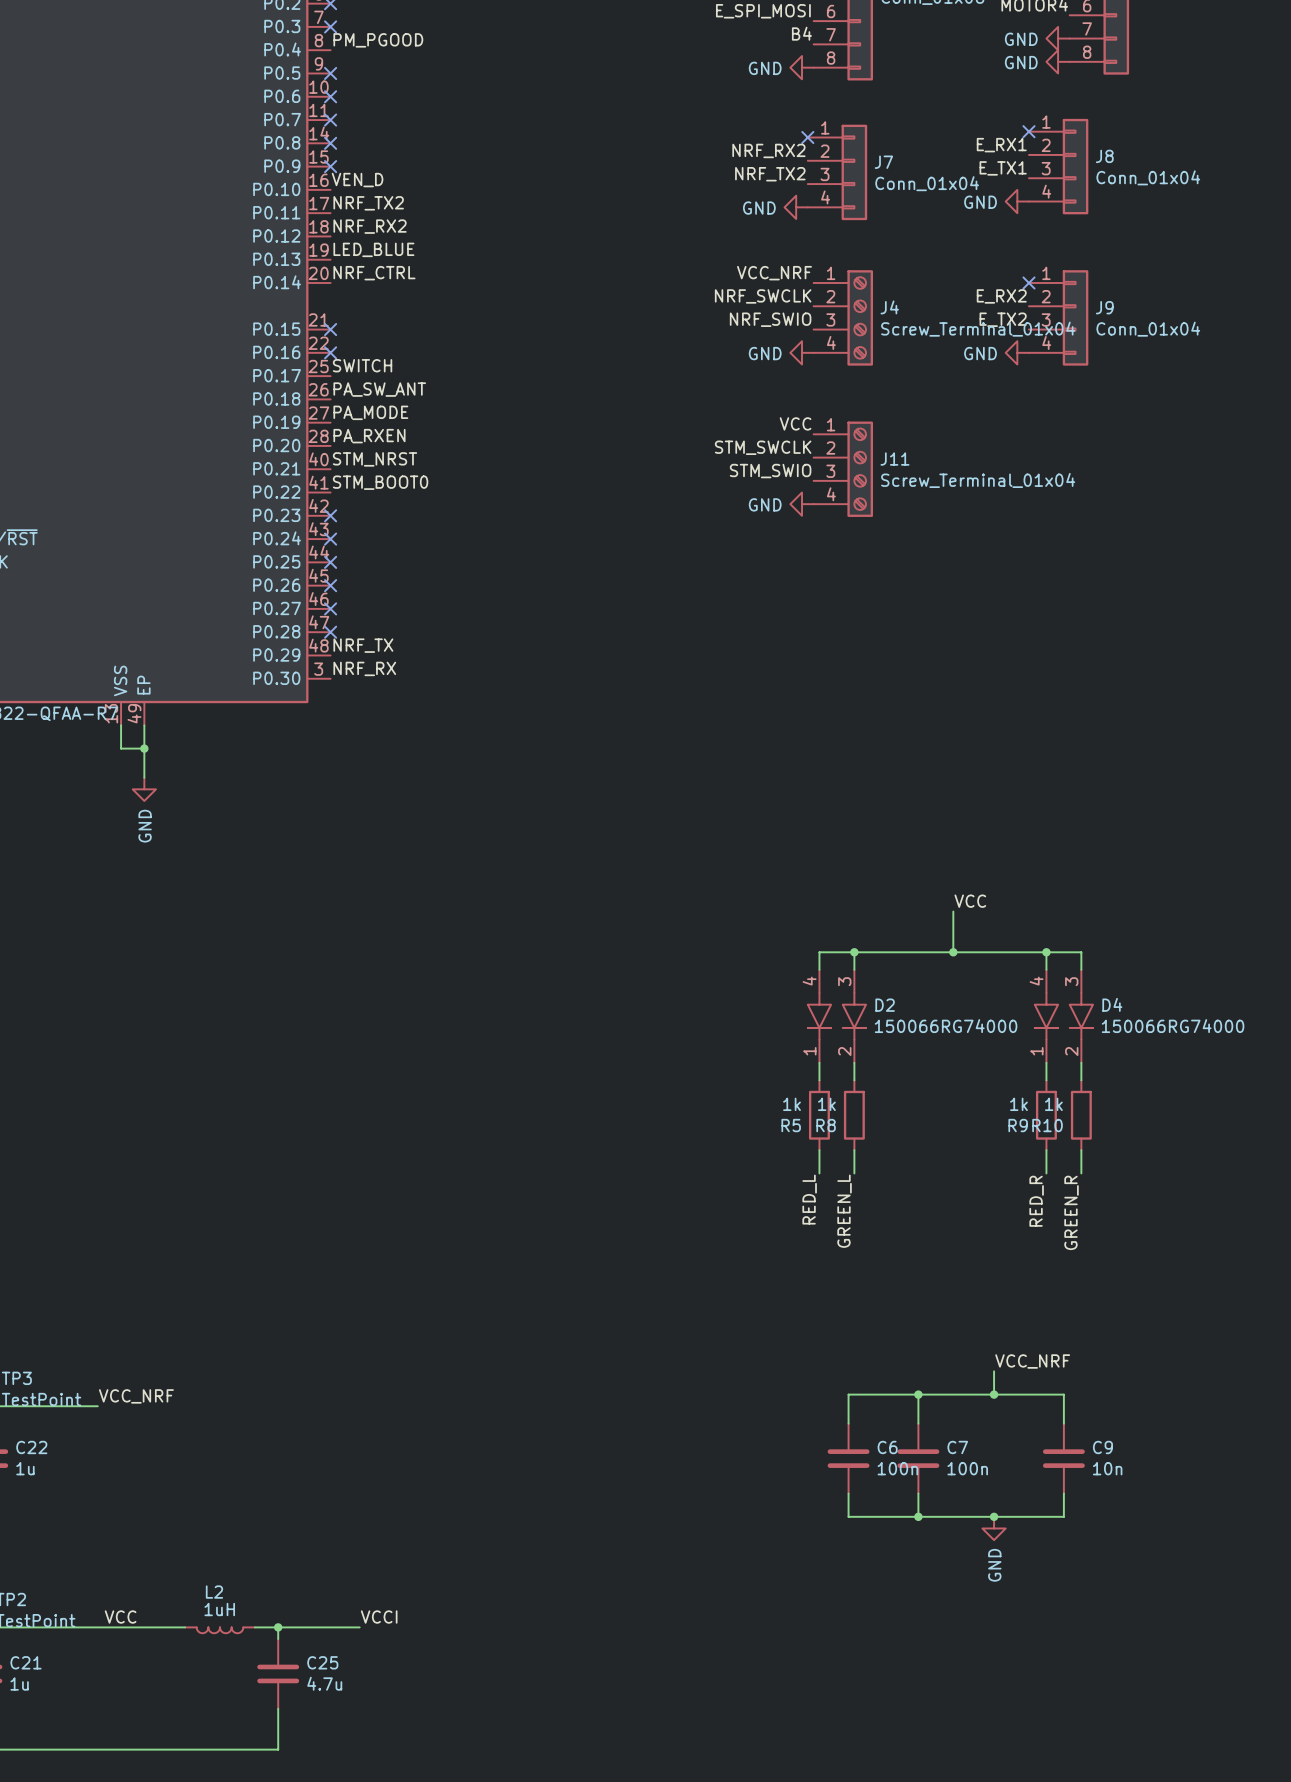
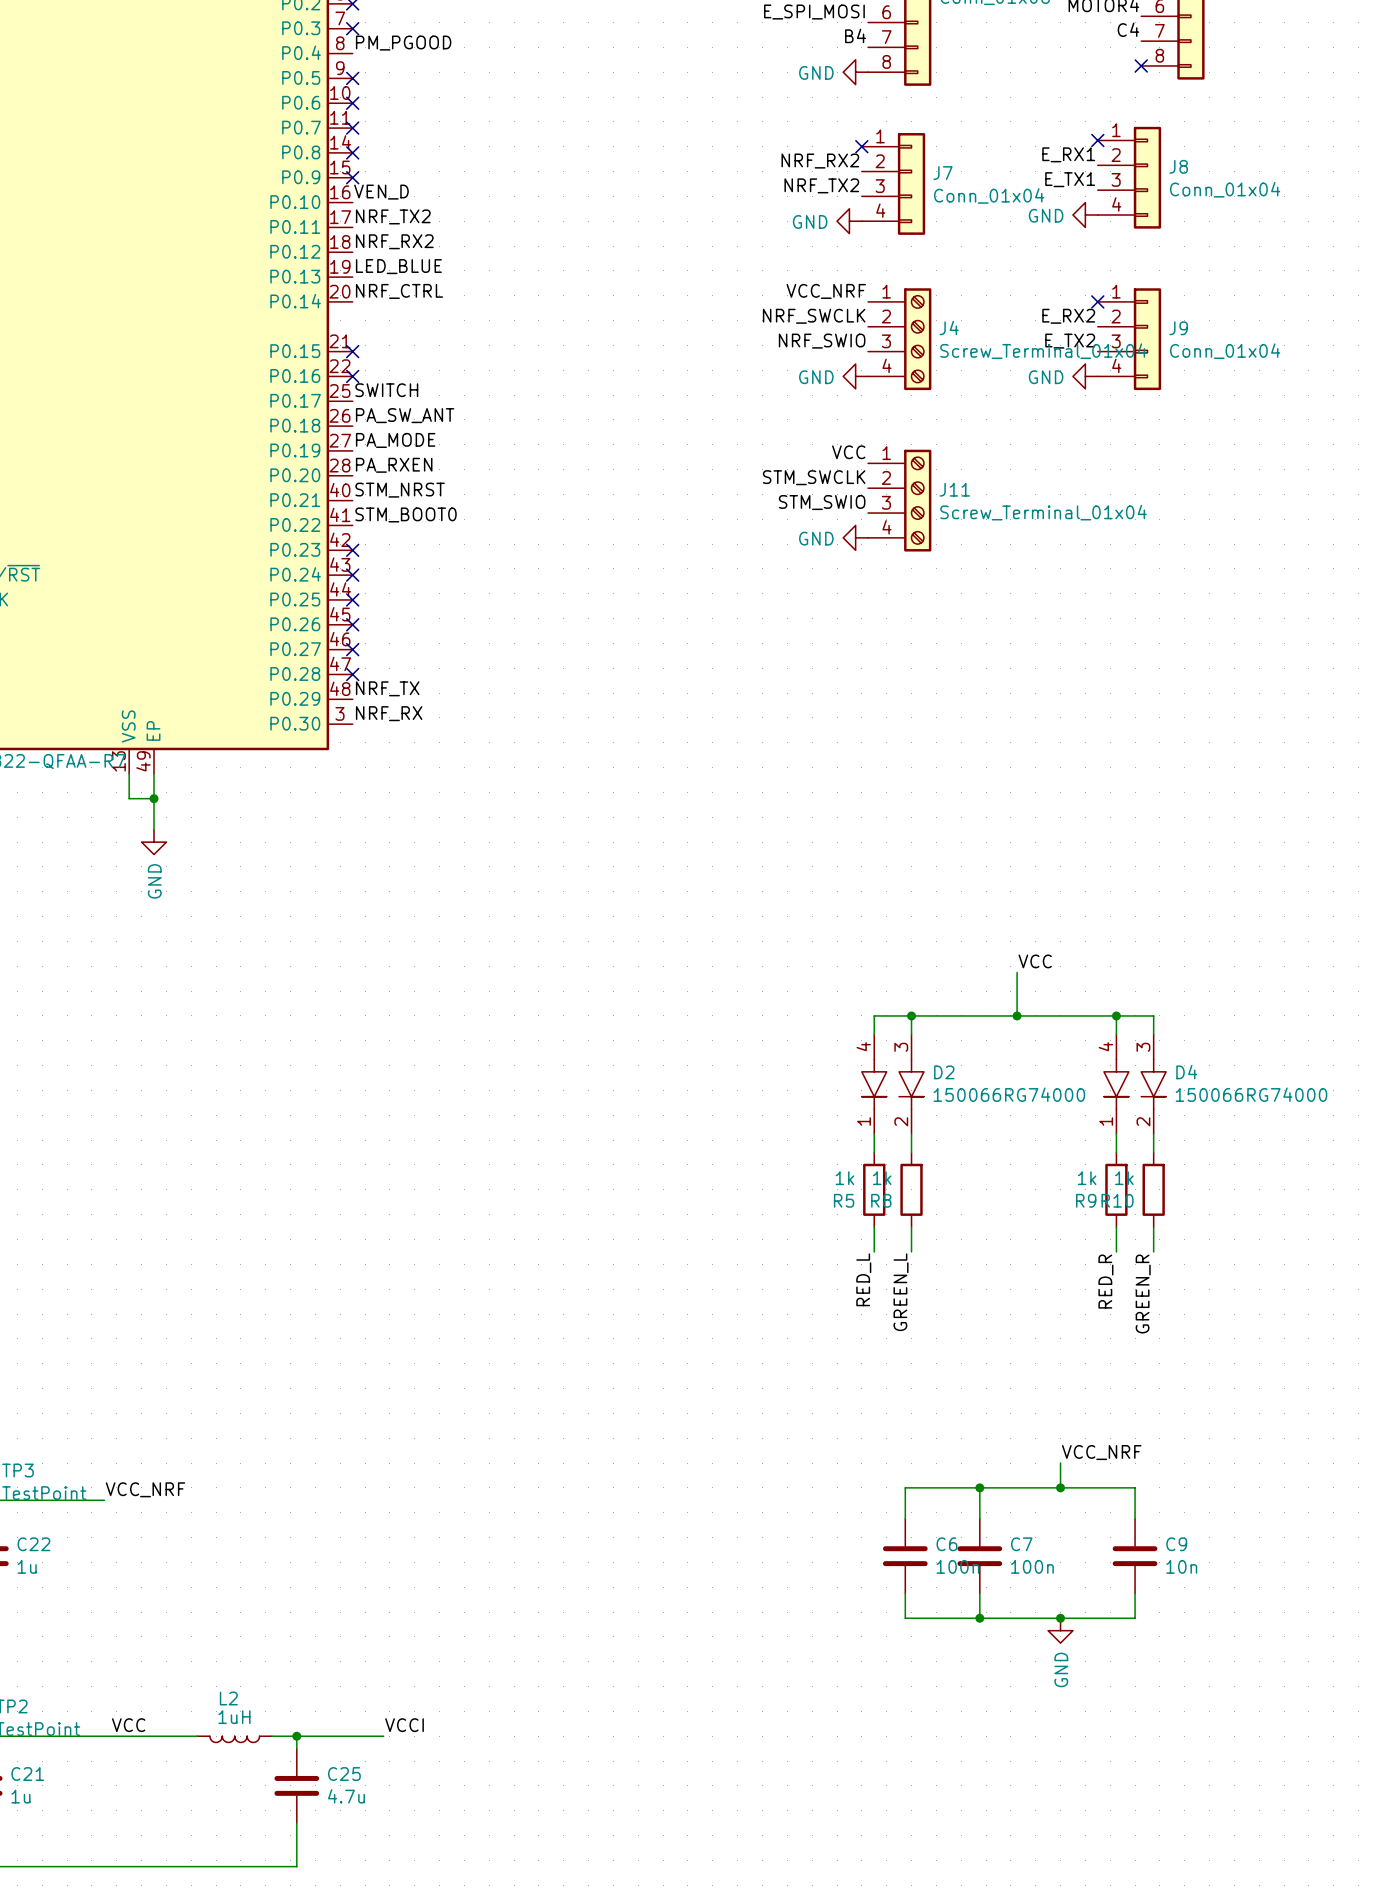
label: none -> C4 (1128, 29)
power symbol: GND (1058, 38) -> none
power symbol: GND (1058, 61) -> none
no-connect mark: none -> (1141, 65)

